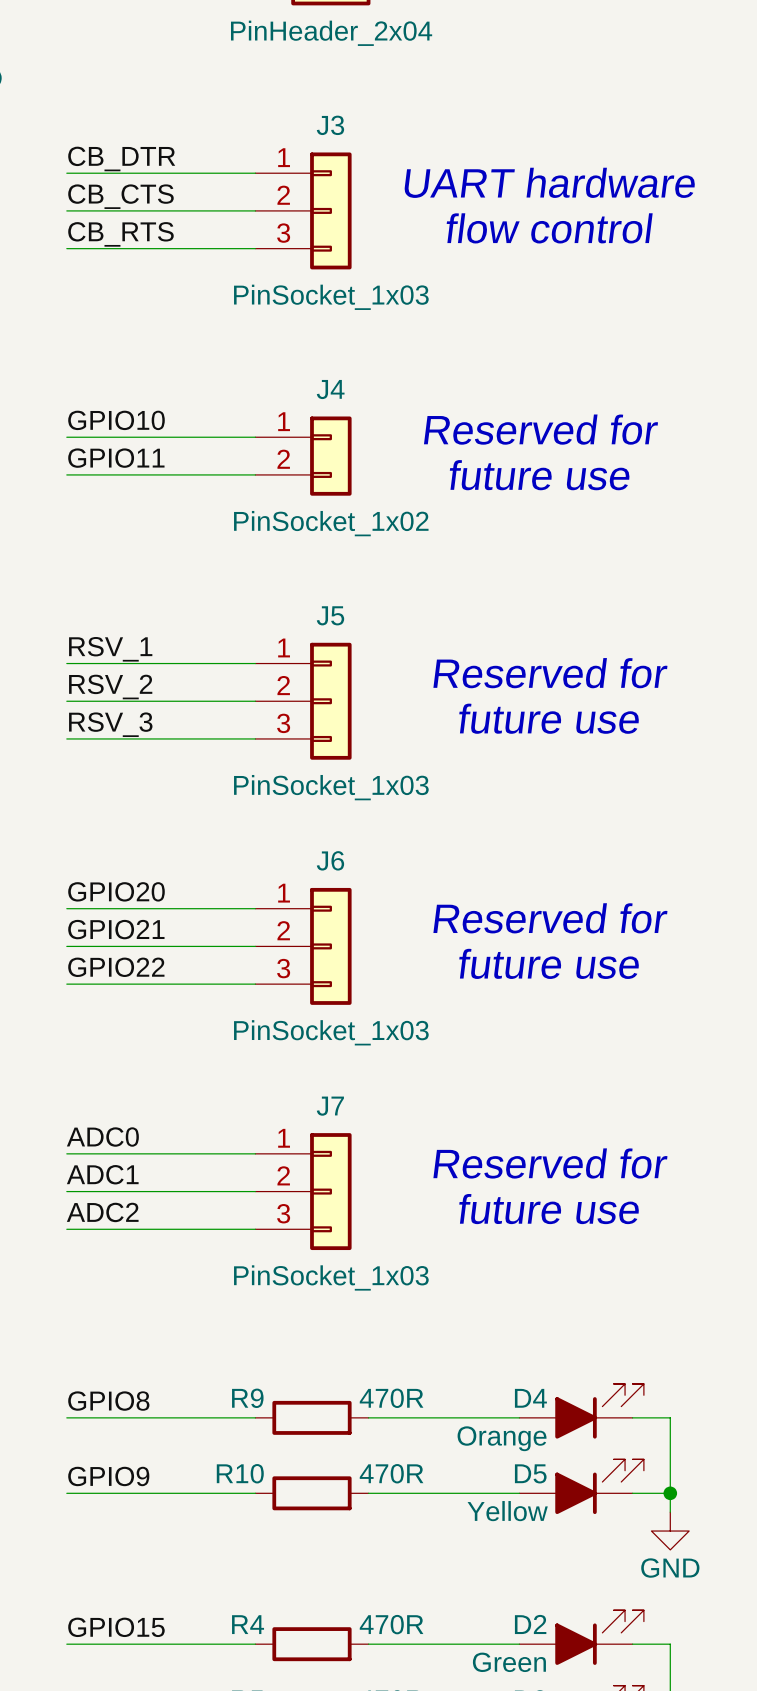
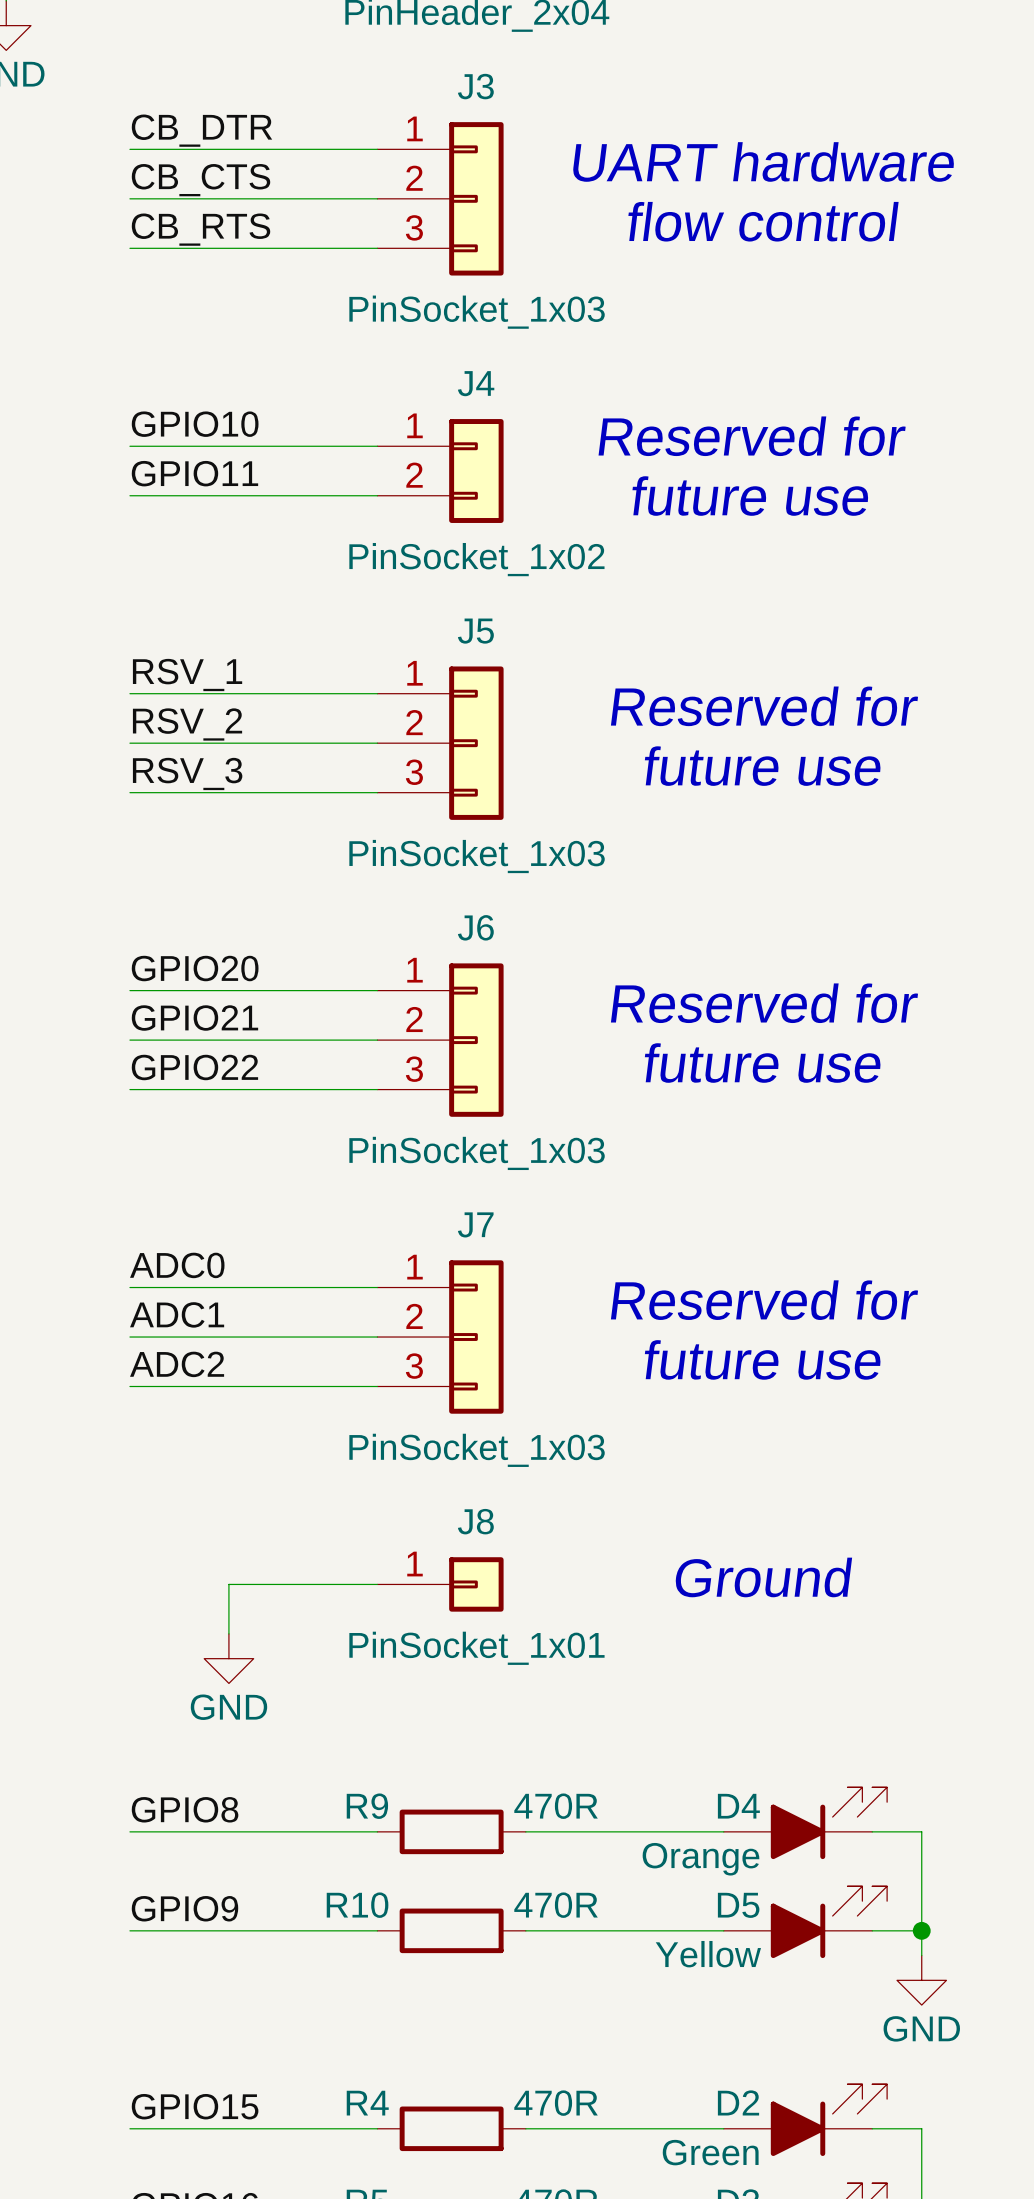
label: none -> CB_DTR (201, 130)
label: CB_DTR (121, 158) -> CB_CTS (201, 180)
text position: UART hardware (550, 182) -> UART hardware (764, 161)
label: CB_CTS (120, 196) -> CB_RTS (201, 229)
J3 position: (303, 210) -> (440, 198)
text position: flow control (549, 228) -> flow control (763, 221)
label: CB_RTS (120, 234) -> none
wire: (66, 248) (255, 248) -> (129, 149) (377, 149)
text: none -> Reserved for (752, 436)
wire: none -> (129, 495) (377, 495)
text: none -> future use (751, 496)
label position: GPIO10 (116, 420) -> GPIO10 (195, 424)
text: Reserved for (541, 429) -> none
wire: (66, 437) (255, 437) -> (129, 990) (377, 990)
J4 position: (303, 456) -> (440, 471)
label position: GPIO11 (116, 458) -> GPIO11 (194, 473)
wire: (66, 474) (255, 474) -> (129, 446) (377, 446)
text: future use (540, 475) -> none
text: none -> Reserved for (764, 706)
text: none -> future use (763, 766)
label position: RSV_1 (110, 649) -> RSV_1 (187, 675)
wire: (66, 663) (255, 663) -> (129, 693) (377, 693)
text: Reserved for (550, 673) -> none
label position: RSV_2 (110, 687) -> RSV_2 (187, 724)
wire: (66, 701) (255, 701) -> (129, 743) (377, 743)
J5 position: (303, 701) -> (440, 743)
text: future use (549, 718) -> none
label position: RSV_3 (110, 724) -> RSV_3 (187, 773)
wire: (66, 738) (255, 738) -> (129, 792) (377, 792)
text: none -> Reserved for (764, 1003)
text: none -> future use (763, 1063)
label position: GPIO20 (116, 891) -> GPIO20 (195, 968)
wire: (66, 908) (255, 908) -> (129, 1287) (377, 1287)
text: Reserved for (550, 918) -> none
label position: GPIO21 (116, 929) -> GPIO21 (194, 1018)
wire: (66, 946) (255, 946) -> (129, 1040) (377, 1040)
J6 position: (303, 946) -> (440, 1040)
text: future use (549, 963) -> none
label position: GPIO22 (116, 967) -> GPIO22 (194, 1067)
wire: (66, 984) (255, 984) -> (129, 1089) (377, 1089)
text: none -> Reserved for (764, 1300)
text: none -> future use (763, 1359)
label position: ADC0 (102, 1137) -> ADC0 (177, 1265)
wire: (66, 1153) (255, 1153) -> (129, 1337) (377, 1337)
text: Reserved for (550, 1163) -> none
label position: ADC1 (102, 1174) -> ADC1 (177, 1314)
wire: (66, 1191) (255, 1191) -> (129, 1386) (377, 1386)
J7 position: (303, 1191) -> (440, 1337)
text: future use (549, 1209) -> none
label position: ADC2 (102, 1212) -> ADC2 (177, 1364)
text: none -> Ground (763, 1577)
wire: (66, 1229) (142, 1229) -> (228, 1633) (228, 1584)
J8: none -> PinSocket_1x01 (440, 1584)
power symbol: none -> GND (228, 1658)

